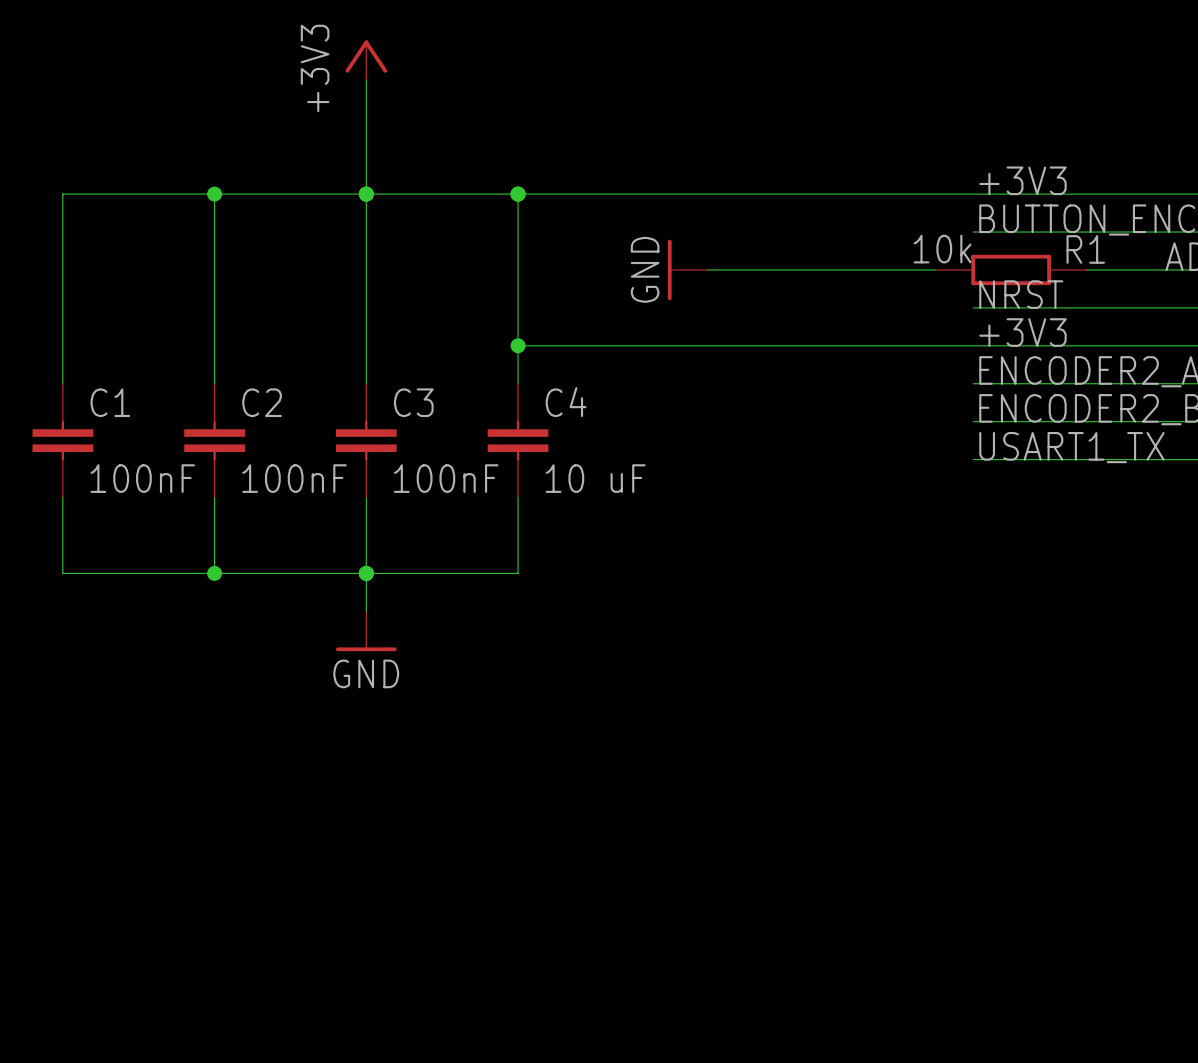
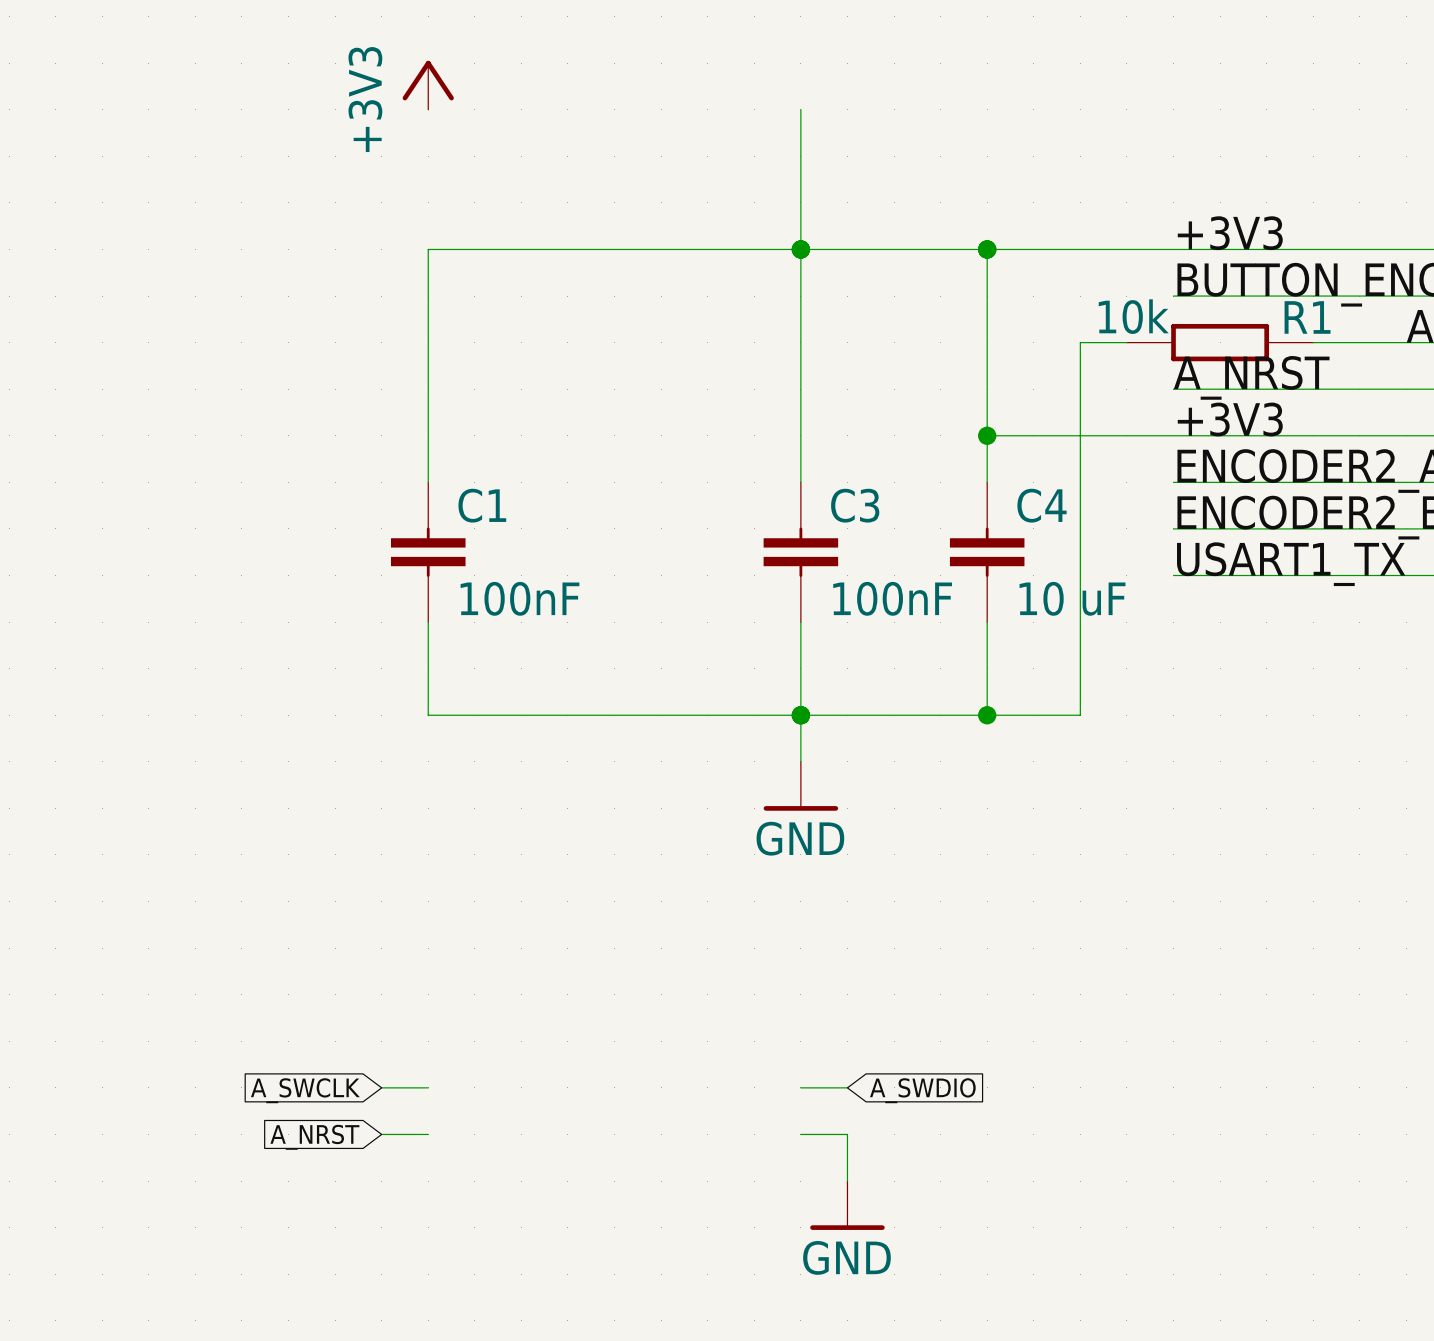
wire: (366, 80) (366, 194) (62, 194) (62, 383) -> none
wire: none -> (800, 109) (800, 482)
wire: (214, 194) (214, 383) -> none
junction: (214, 194) -> none
junction: (366, 194) -> none
wire: (518, 194) (518, 383) -> (987, 249) (987, 482)
junction: (518, 194) -> none
junction: none -> (800, 249)
junction: none -> (987, 249)
power symbol: GND (687, 269) -> none
wire: (707, 269) (897, 269) -> (614, 715) (1080, 715) (1080, 342)
label: NRST (1021, 294) -> A_NRST (1251, 377)
wire: (518, 345) (821, 345) -> none
junction: (518, 345) -> none
junction: none -> (987, 435)
C3 name: C3 (413, 402) -> C1 (482, 505)
C1: 100nF (62, 440) -> none
C2: 100nF (214, 440) -> none
C4 position: (518, 440) -> (987, 552)
C3: none -> 100nF (800, 552)
wire: (62, 497) (62, 573) (366, 573) (366, 611) -> none
wire: (214, 497) (214, 573) -> none
wire: (518, 497) (518, 573) -> (987, 622) (987, 715)
wire: none -> (800, 622) (800, 761)
junction: (214, 573) -> none
junction: (366, 573) -> none
junction: none -> (800, 715)
junction: none -> (987, 715)
power symbol: GND (366, 631) -> none
power symbol: none -> GND (800, 786)
wire: none -> (381, 1087) (428, 1087)
wire: none -> (800, 1087) (847, 1087)
global label: none -> A_SWCLK (305, 1090)
global label: none -> A_SWDIO (922, 1090)
wire: none -> (381, 1134) (428, 1134)
wire: none -> (800, 1134) (847, 1134) (847, 1181)
global label: none -> A_NRST (314, 1137)
power symbol: none -> GND (847, 1205)

